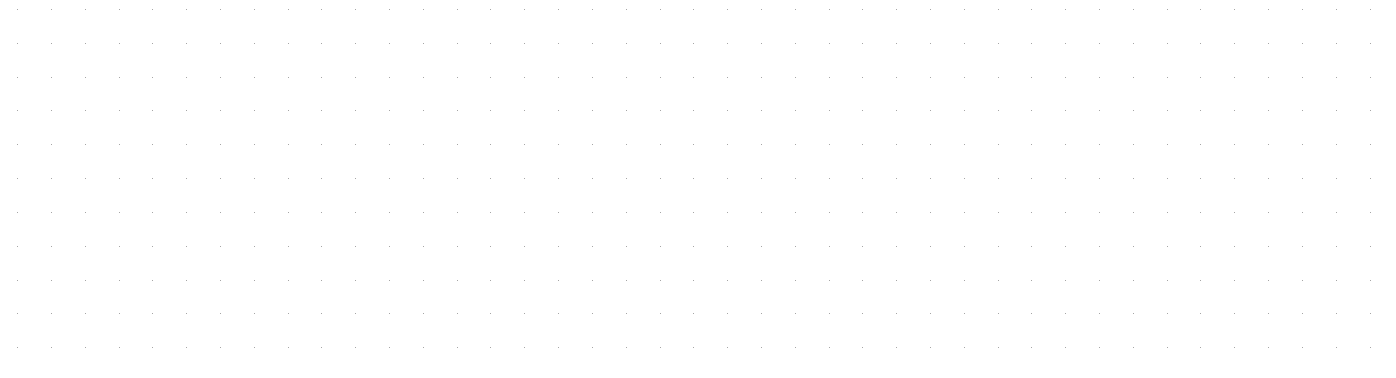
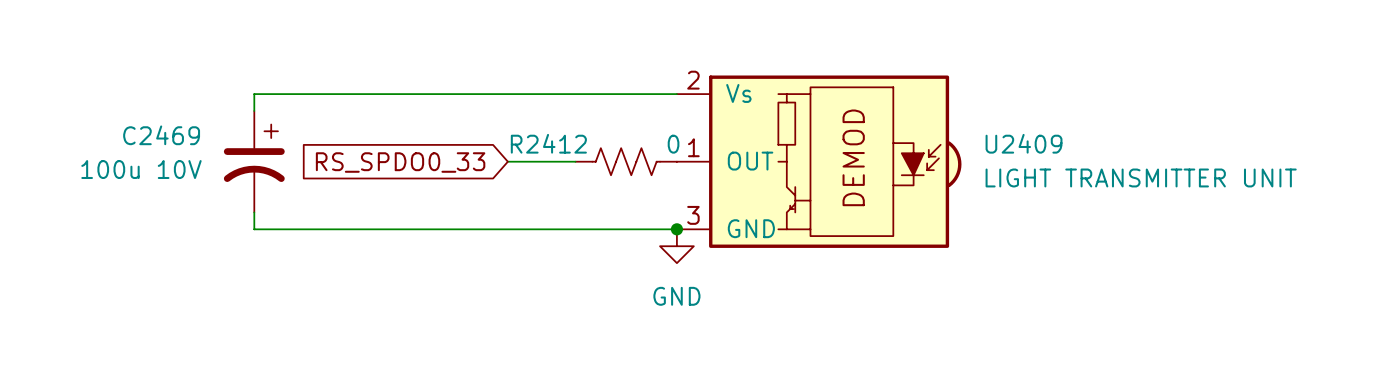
wire: none -> (676, 94) (254, 94) (254, 110)
C2469: none -> 100u 10V (254, 161)
wire: none -> (507, 161) (575, 161)
R2412: none -> 0 (626, 161)
U2409: none -> LIGHT TRANSMITTER UNIT (819, 161)
global label: none -> RS_SPDO0_33 (400, 162)
wire: none -> (254, 212) (254, 229) (676, 229)
junction: none -> (676, 229)
power symbol: none -> GND (676, 246)

